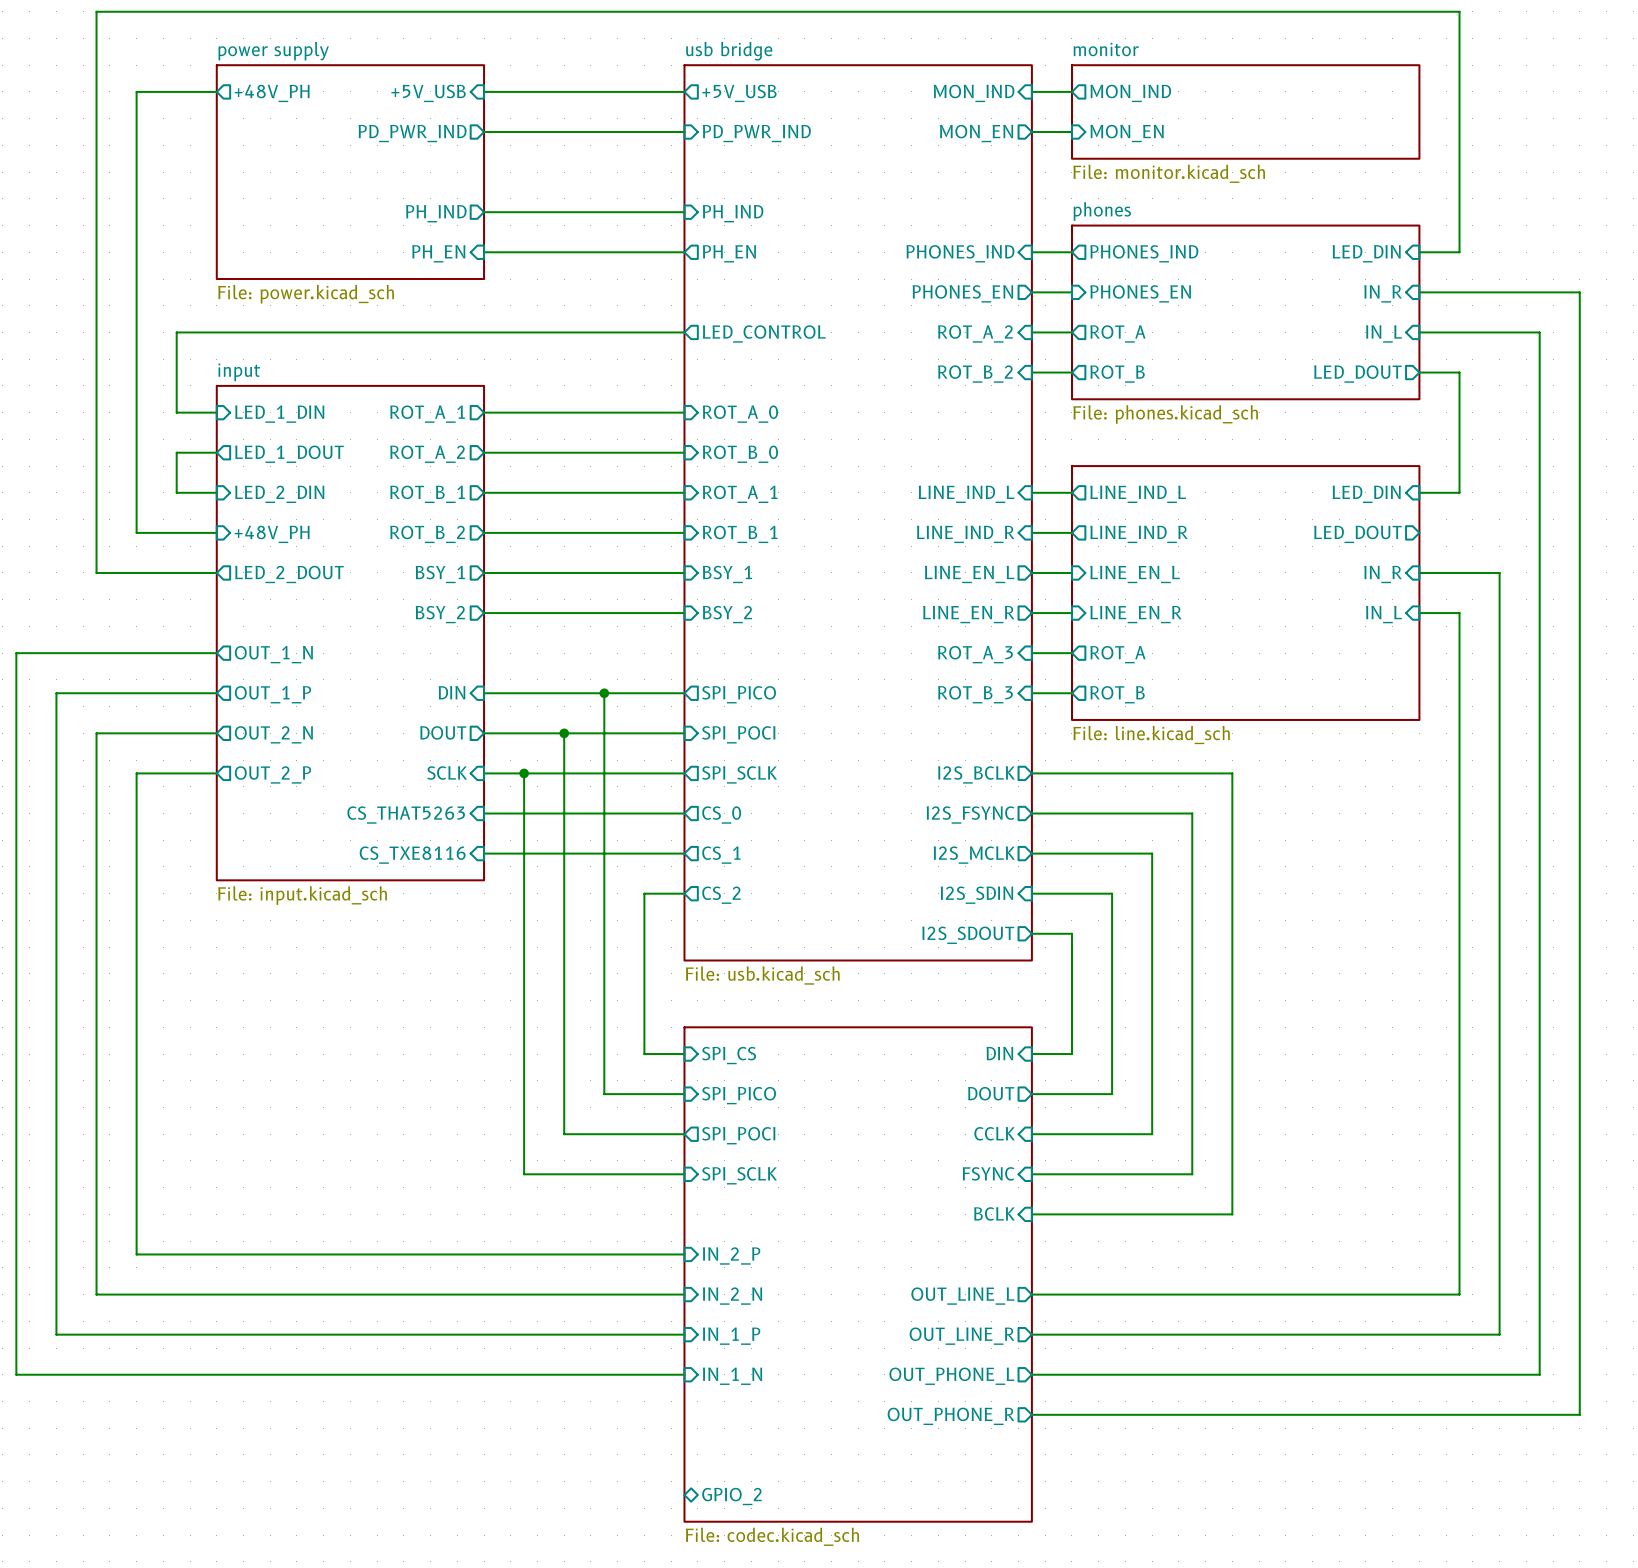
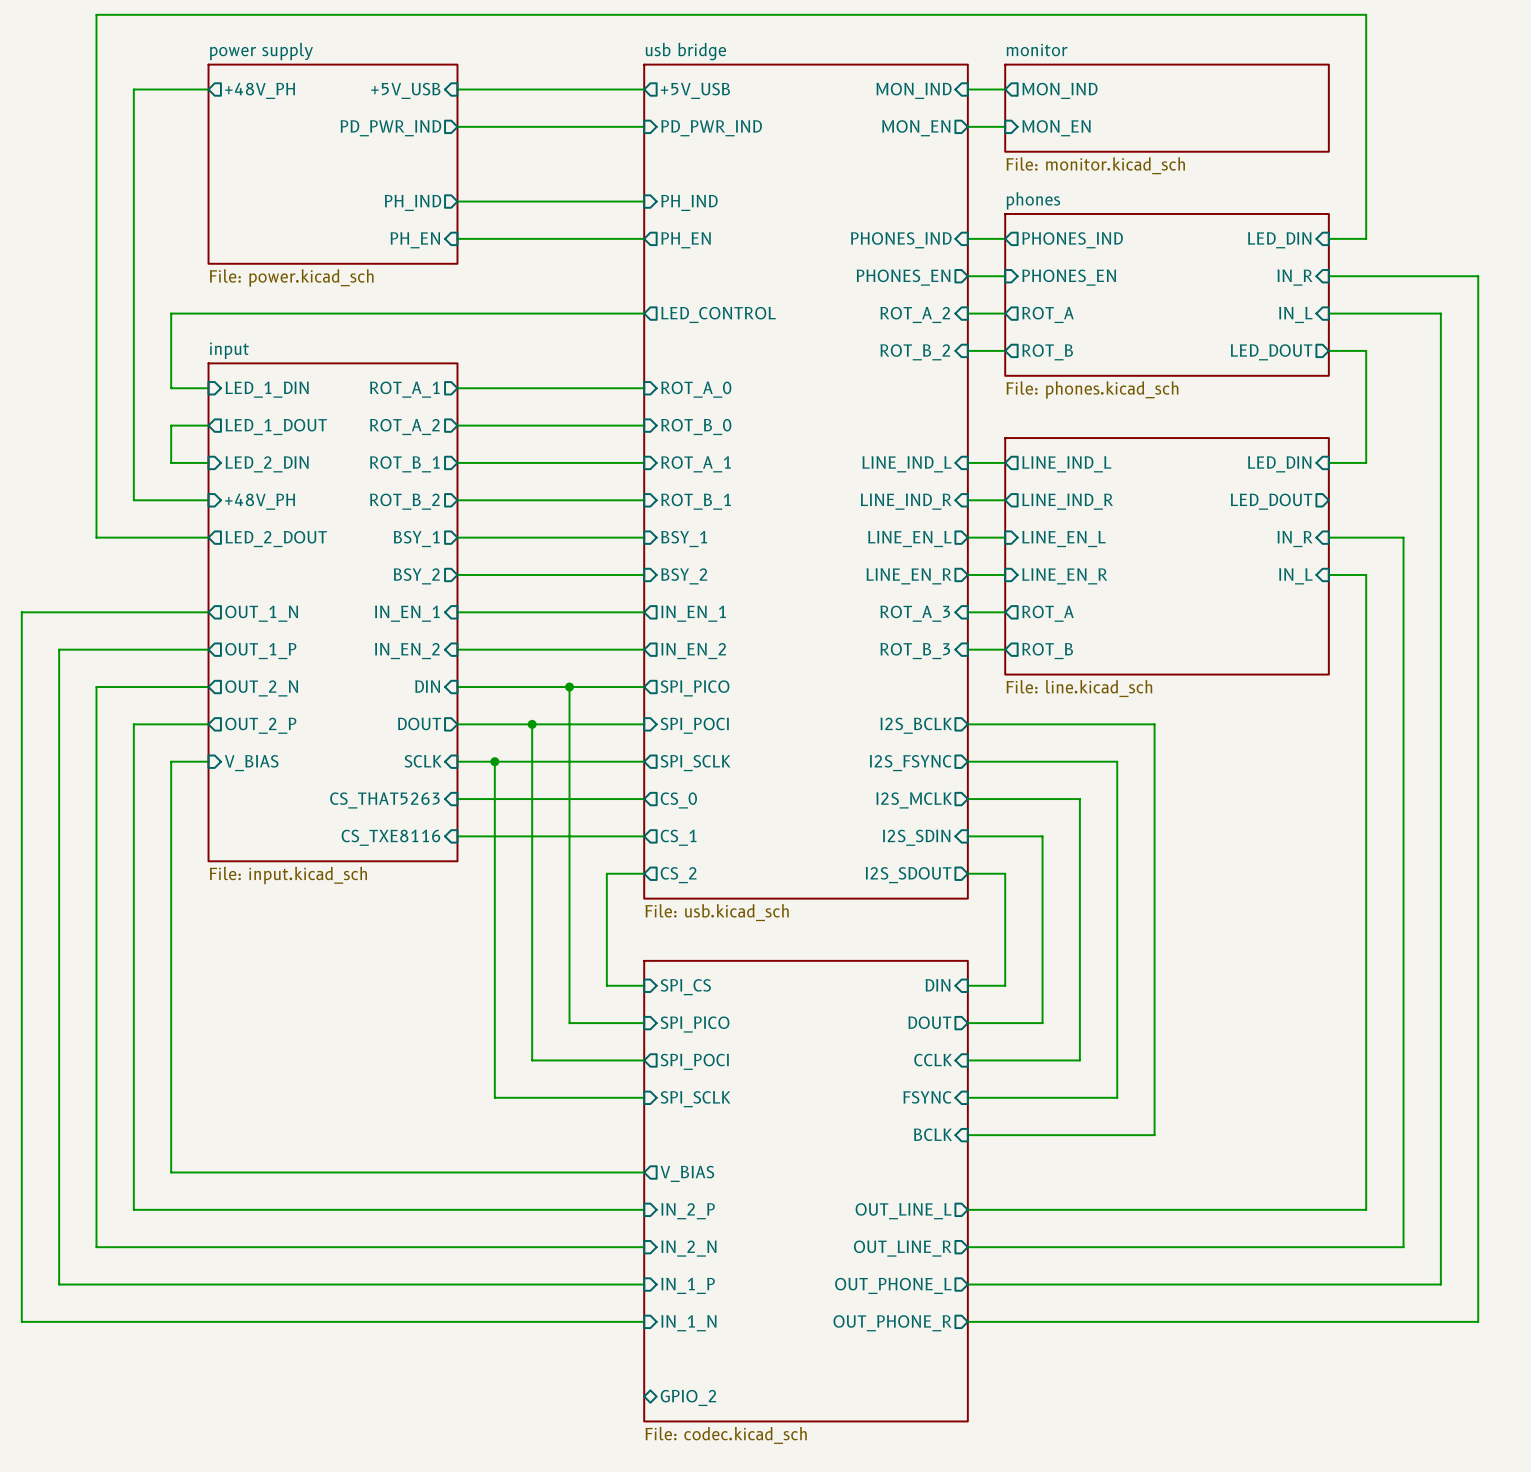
sheet input: File: input.kicad_sch (350, 633) -> none
sheet input: none -> File: input.kicad_sch (333, 612)
wire: none -> (457, 612) (644, 612)
sheet pin: none -> IN_EN_1 (407, 613)
sheet pin: none -> IN_EN_1 (693, 613)
sheet pin: DIN (451, 692) -> IN_EN_2 (407, 651)
wire: (604, 693) (604, 733) -> none
junction: (604, 693) -> none
sheet pin: SPI_PICO (739, 694) -> IN_EN_2 (693, 651)
sheet pin shape: output (443, 732) -> input (427, 686)
sheet pin: DOUT (443, 732) -> DIN (427, 686)
wire: (564, 733) (564, 773) -> none
junction: (564, 733) -> none
junction: none -> (569, 687)
sheet pin shape: input (738, 734) -> output (695, 688)
sheet pin: SPI_POCI (738, 734) -> SPI_PICO (695, 688)
sheet pin shape: input (447, 772) -> output (419, 723)
sheet pin: SCLK (447, 772) -> DOUT (419, 723)
wire: (524, 773) (524, 813) -> none
junction: (524, 773) -> none
junction: none -> (532, 724)
sheet pin shape: output (739, 774) -> input (694, 725)
sheet pin: SPI_SCLK (739, 774) -> SPI_POCI (694, 725)
wire: none -> (208, 761) (171, 761) (171, 1172)
junction: none -> (494, 761)
sheet pin: none -> V_BIAS (251, 763)
sheet pin: CS_THAT5263 (406, 815) -> SCLK (423, 761)
sheet pin: CS_0 (721, 815) -> SPI_SCLK (695, 763)
sheet pin: CS_TXE8116 (412, 855) -> CS_THAT5263 (384, 800)
sheet pin: CS_1 (721, 855) -> CS_0 (678, 800)
wire: none -> (457, 836) (606, 836)
wire: (644, 893) (644, 933) -> (644, 873) (606, 873)
sheet pin: none -> CS_TXE8116 (390, 837)
sheet pin: CS_2 (721, 895) -> CS_1 (678, 837)
sheet pin: none -> CS_2 (678, 875)
wire: (136, 1254) (176, 1254) -> (133, 1172) (133, 1209)
sheet pin shape: input (731, 1255) -> output (687, 1173)
sheet pin: IN_2_P (731, 1255) -> V_BIAS (687, 1173)
wire: (96, 1294) (136, 1294) -> none
sheet pin: IN_2_N (732, 1296) -> IN_2_P (688, 1211)
wire: (56, 1334) (96, 1334) -> (96, 1209) (96, 1247)
sheet pin: IN_1_P (731, 1336) -> IN_2_N (688, 1248)
wire: (16, 1374) (56, 1374) -> (59, 1247) (59, 1284)
wire: none -> (21, 1284) (21, 1321) (644, 1321)
sheet pin: IN_1_N (732, 1376) -> IN_1_P (688, 1285)
sheet pin: none -> IN_1_N (688, 1323)

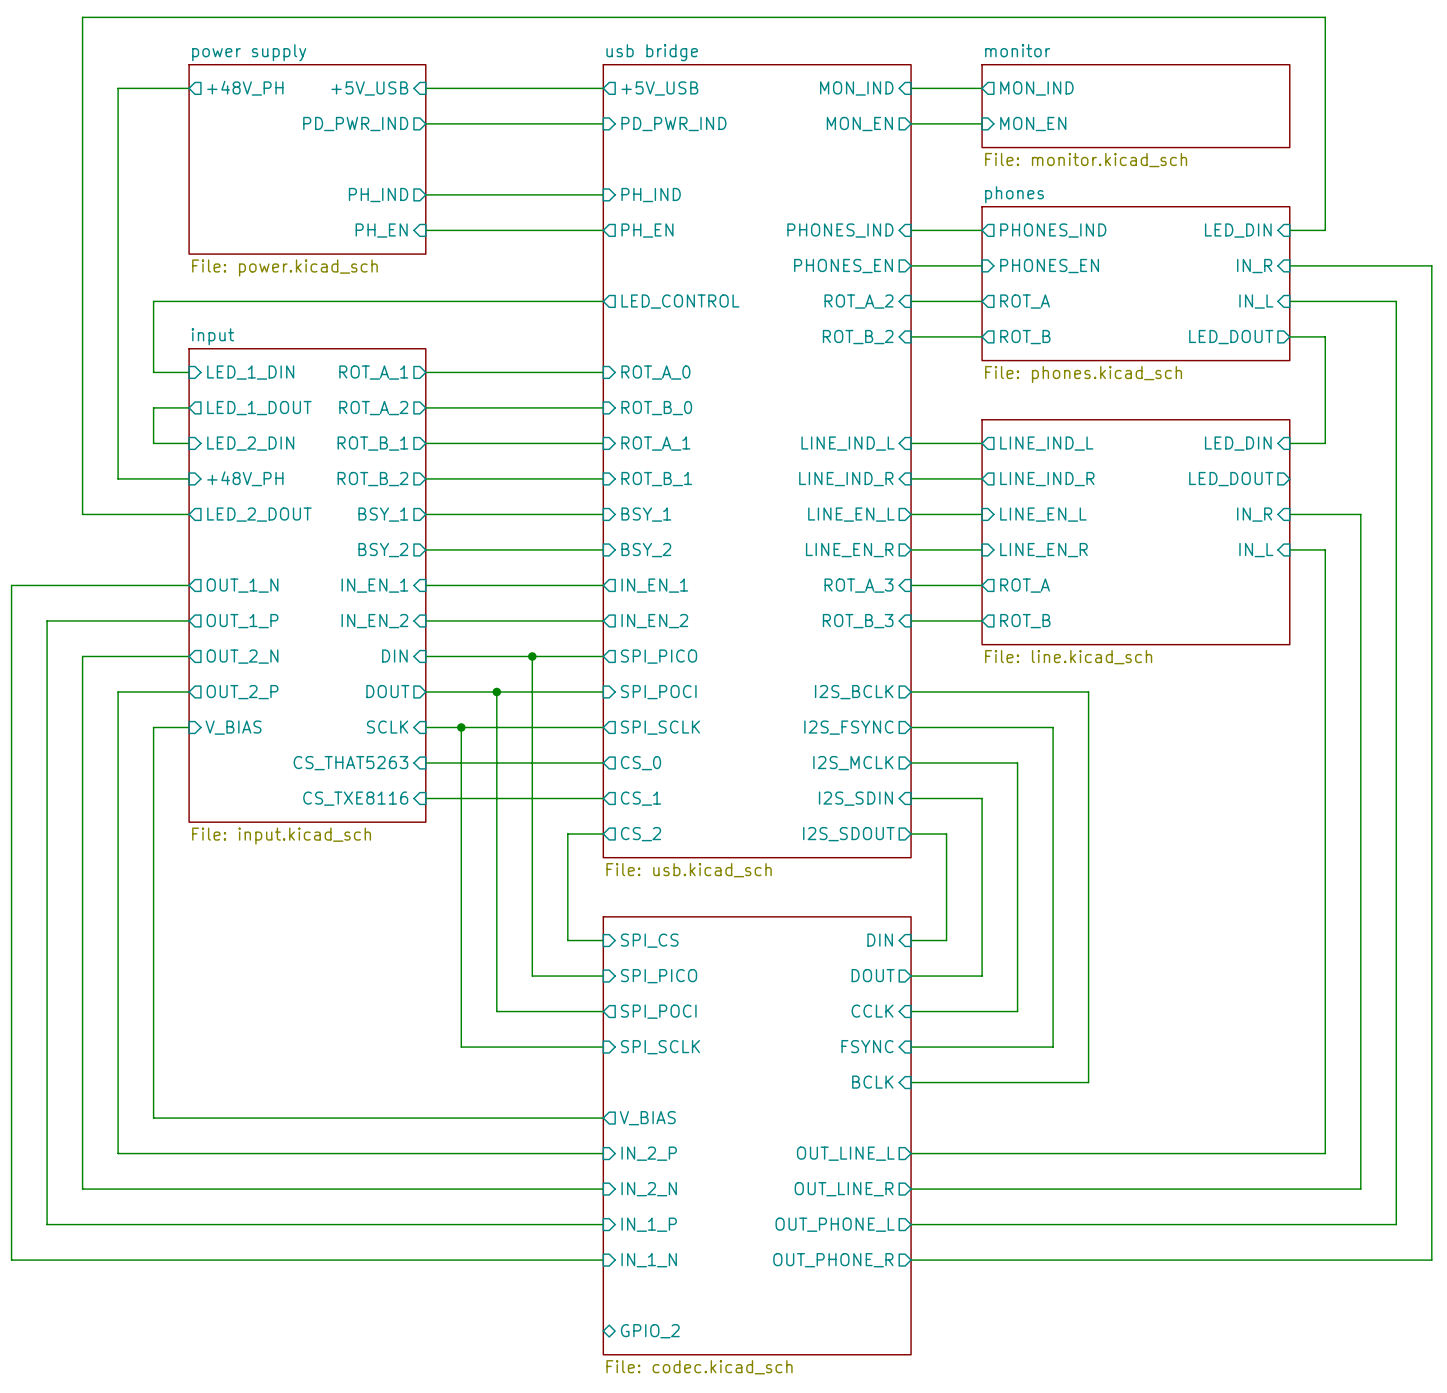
wire: (1366, 14) (1366, 238) (1328, 238) -> (1289, 17) (1325, 17) (1325, 230) (1289, 230)
wire: none -> (946, 88) (982, 88)
sheet pin position: MON_IND (1059, 90) -> MON_IND (1036, 88)
sheet monitor position: (1167, 108) -> (1135, 106)
wire: none -> (946, 123) (982, 123)
sheet pin position: MON_EN (1056, 128) -> MON_EN (1033, 124)
wire: none -> (946, 230) (982, 230)
sheet pin position: PHONES_IND (1072, 240) -> PHONES_IND (1053, 230)
sheet pin position: LED_DIN (1279, 240) -> LED_DIN (1238, 230)
wire: none -> (946, 265) (982, 265)
wire: (1328, 276) (1366, 276) -> none
wire: (1478, 276) (1478, 313) -> (1360, 301) (1396, 301)
wire: none -> (1396, 265) (1431, 265) (1431, 1260) (1396, 1260)
sheet pin position: PHONES_EN (1069, 277) -> PHONES_EN (1049, 266)
sheet pin position: IN_R (1294, 277) -> IN_R (1254, 266)
sheet phones position: (1167, 294) -> (1135, 283)
wire: none -> (946, 301) (982, 301)
wire: (1328, 313) (1366, 313) -> none
wire: (1440, 313) (1440, 537) -> none
sheet pin position: ROT_A (1047, 314) -> ROT_A (1025, 301)
sheet pin position: IN_L (1295, 314) -> IN_L (1256, 301)
wire: none -> (946, 336) (982, 336)
wire: (1328, 350) (1366, 350) (1366, 462) (1328, 462) -> (1289, 336) (1325, 336) (1325, 443) (1289, 443)
sheet pin position: ROT_B (1047, 352) -> ROT_B (1025, 337)
sheet pin position: LED_DOUT (1271, 352) -> LED_DOUT (1231, 337)
wire: none -> (946, 443) (982, 443)
sheet pin position: LINE_IND_L (1066, 464) -> LINE_IND_L (1046, 443)
sheet pin position: LED_DIN (1279, 464) -> LED_DIN (1238, 443)
wire: none -> (946, 478) (982, 478)
sheet pin position: LINE_IND_R (1067, 501) -> LINE_IND_R (1047, 479)
sheet pin position: LED_DOUT (1271, 501) -> LED_DOUT (1231, 479)
wire: none -> (946, 514) (982, 514)
wire: (1328, 537) (1366, 537) -> (1289, 549) (1325, 549)
wire: (1403, 537) (1403, 574) -> (1325, 514) (1360, 514)
sheet pin position: LINE_EN_L (1064, 539) -> LINE_EN_L (1043, 514)
sheet pin position: IN_R (1294, 539) -> IN_R (1254, 514)
sheet position: (1167, 556) -> (1135, 532)
wire: none -> (946, 549) (982, 549)
wire: (1328, 574) (1366, 574) (1366, 1209) -> none
sheet pin position: LINE_EN_R (1064, 576) -> LINE_EN_R (1043, 550)
sheet pin position: IN_L (1295, 576) -> IN_L (1256, 550)
wire: none -> (946, 585) (982, 585)
sheet pin position: ROT_A (1047, 613) -> ROT_A (1025, 585)
wire: none -> (946, 620) (982, 620)
sheet pin position: ROT_B (1047, 651) -> ROT_B (1025, 621)
wire: (1403, 1209) (1403, 1247) -> (1325, 1153) (1289, 1153)
wire: (1440, 1247) (1440, 1284) -> (1360, 1189) (1325, 1189)
wire: (1478, 1284) (1478, 1321) -> (1396, 1224) (1360, 1224)

